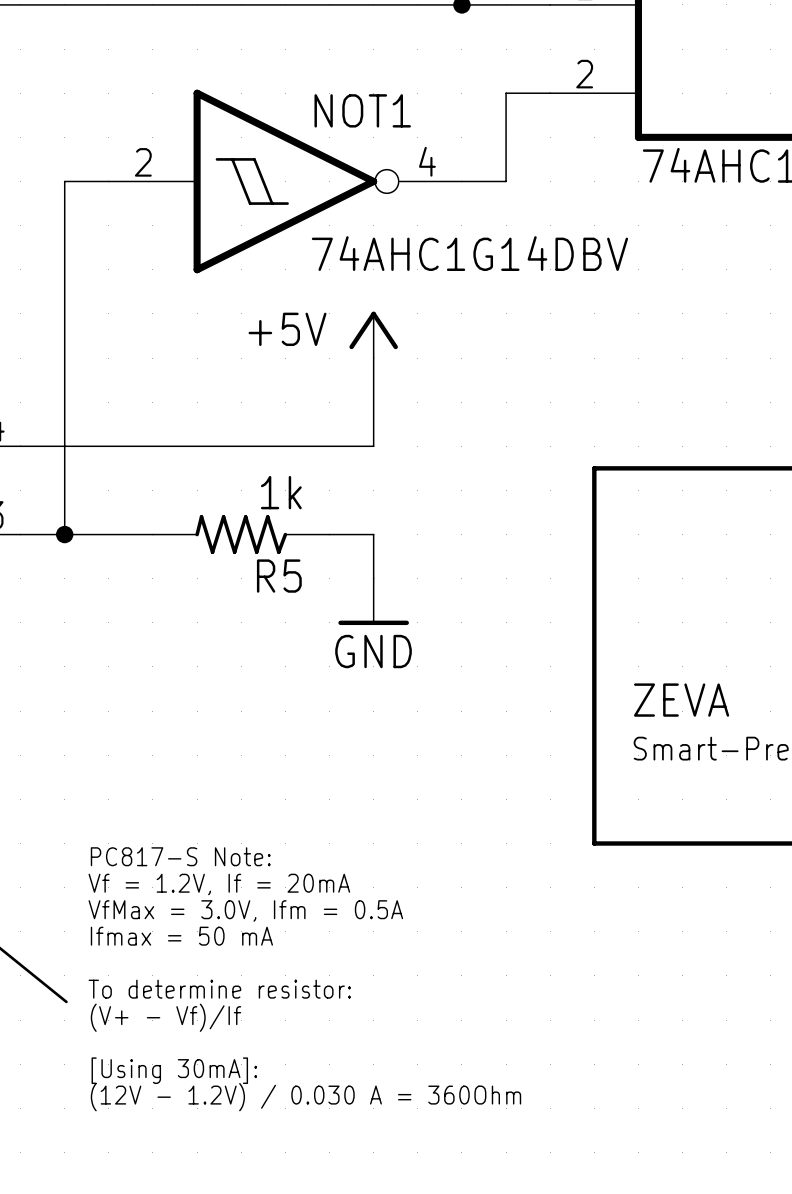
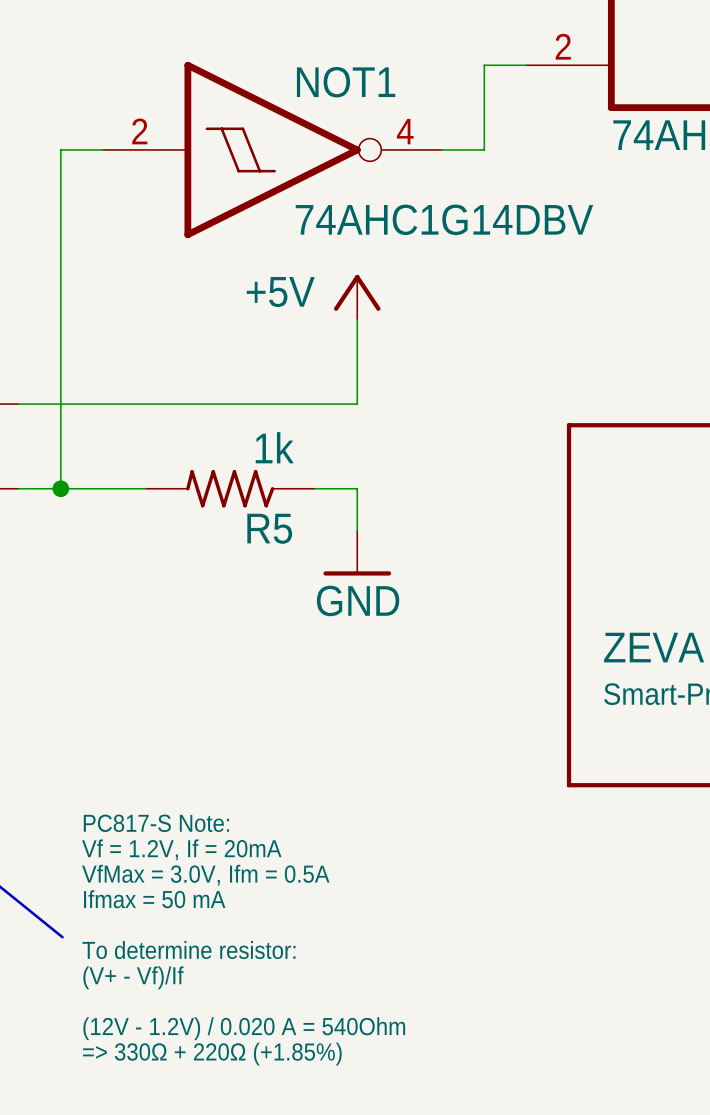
text: PC817-S Note: (180, 856) -> none
text: Vf = 1.2V, If = 20mA (219, 884) -> PC817-S Note: (156, 823)
text: VfMax = 3.0V, Ifm = 0.5A (245, 910) -> Vf = 1.2V, If = 20mA (181, 849)
text: Ifmax = 50 mA (181, 936) -> VfMax = 3.0V, Ifm = 0.5A (205, 875)
text: none -> Ifmax = 50 mA (154, 899)
text: To determine resistor: (219, 989) -> none
text: (V+ - Vf)/If (166, 1017) -> To determine resistor: (188, 950)
text: none -> (V+ - Vf)/If (133, 977)
text: [Using 30mA]: (174, 1070) -> none
text: (12V - 1.2V) / 0.030 A = 360Ohm (305, 1097) -> (12V - 1.2V) / 0.020 A = 540Ohm (244, 1028)
text: none -> => 330Ω + 220Ω (+1.85%) (212, 1054)

